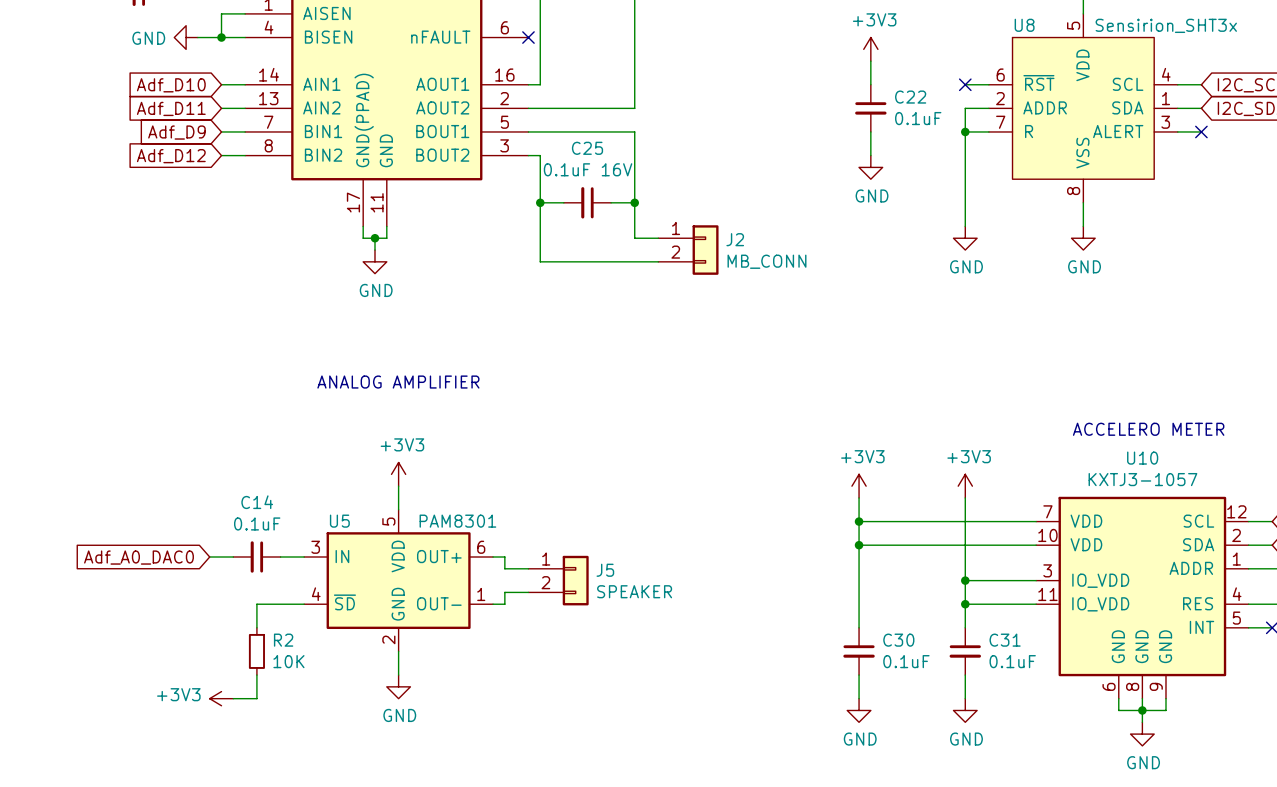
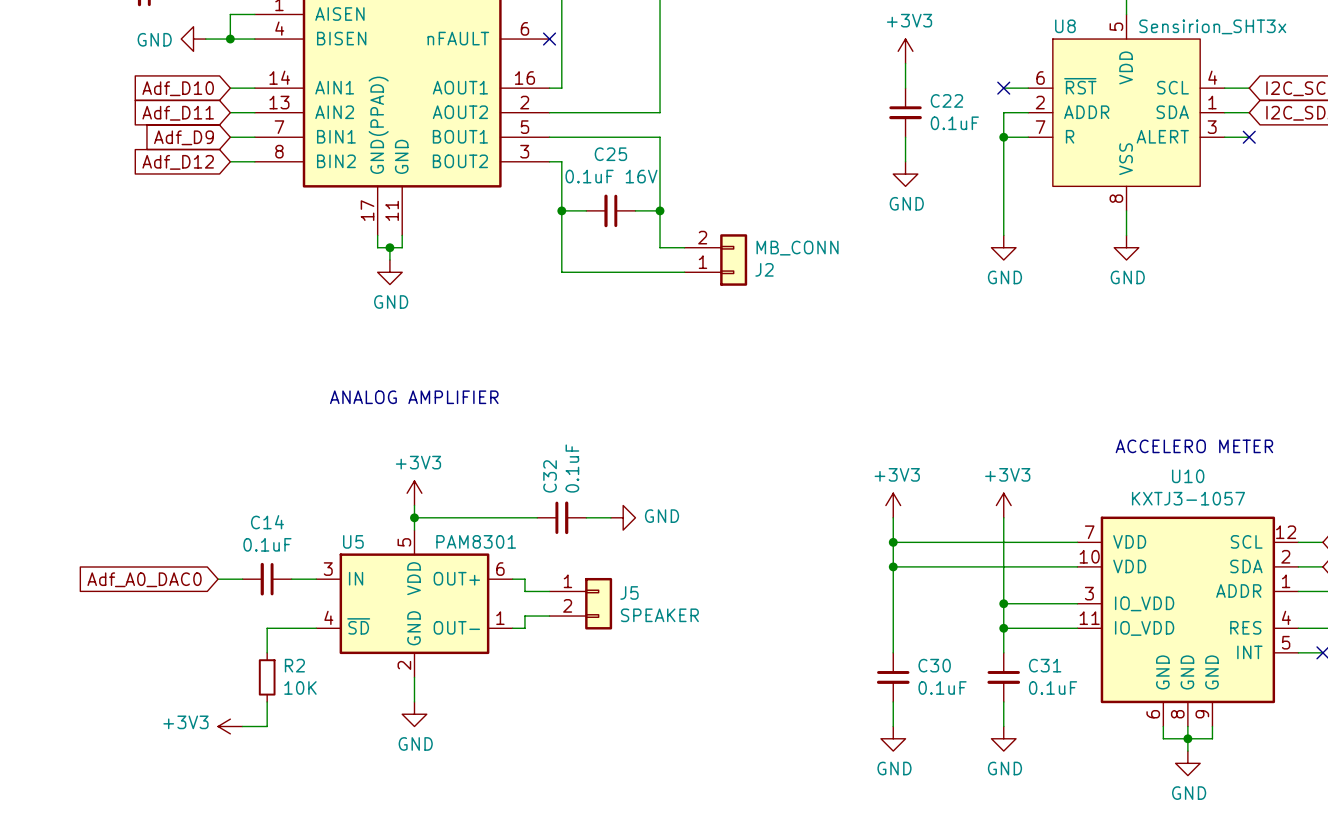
J2 flip: as is (705, 250) -> up-down (733, 260)
wire: none -> (414, 517) (537, 517)
junction: none -> (414, 517)
C32: none -> 0.1uF (561, 517)
wire: none -> (586, 517) (610, 517)
power symbol: none -> GND (623, 517)

